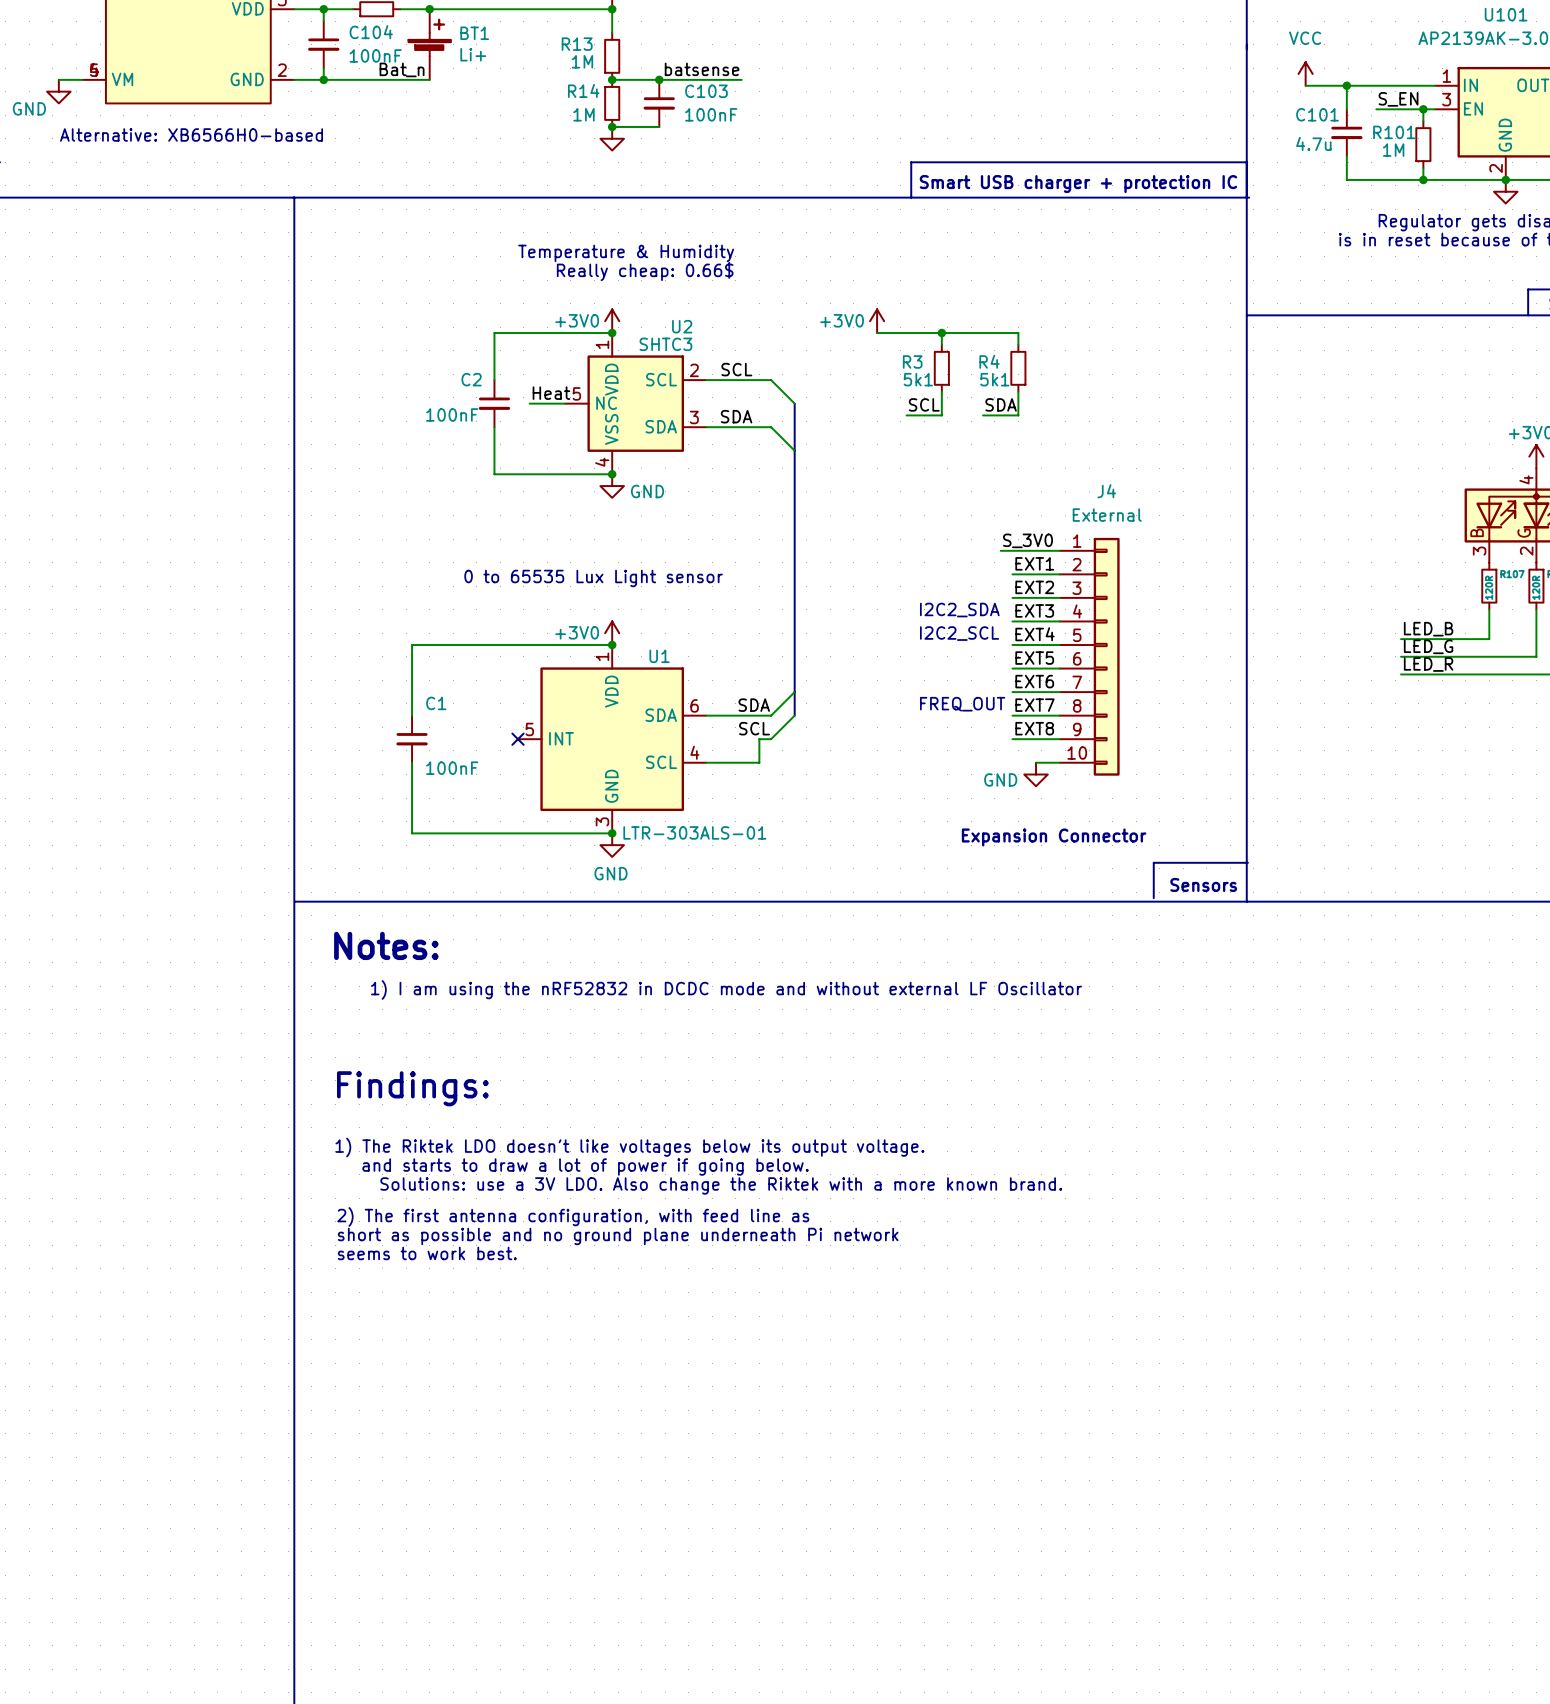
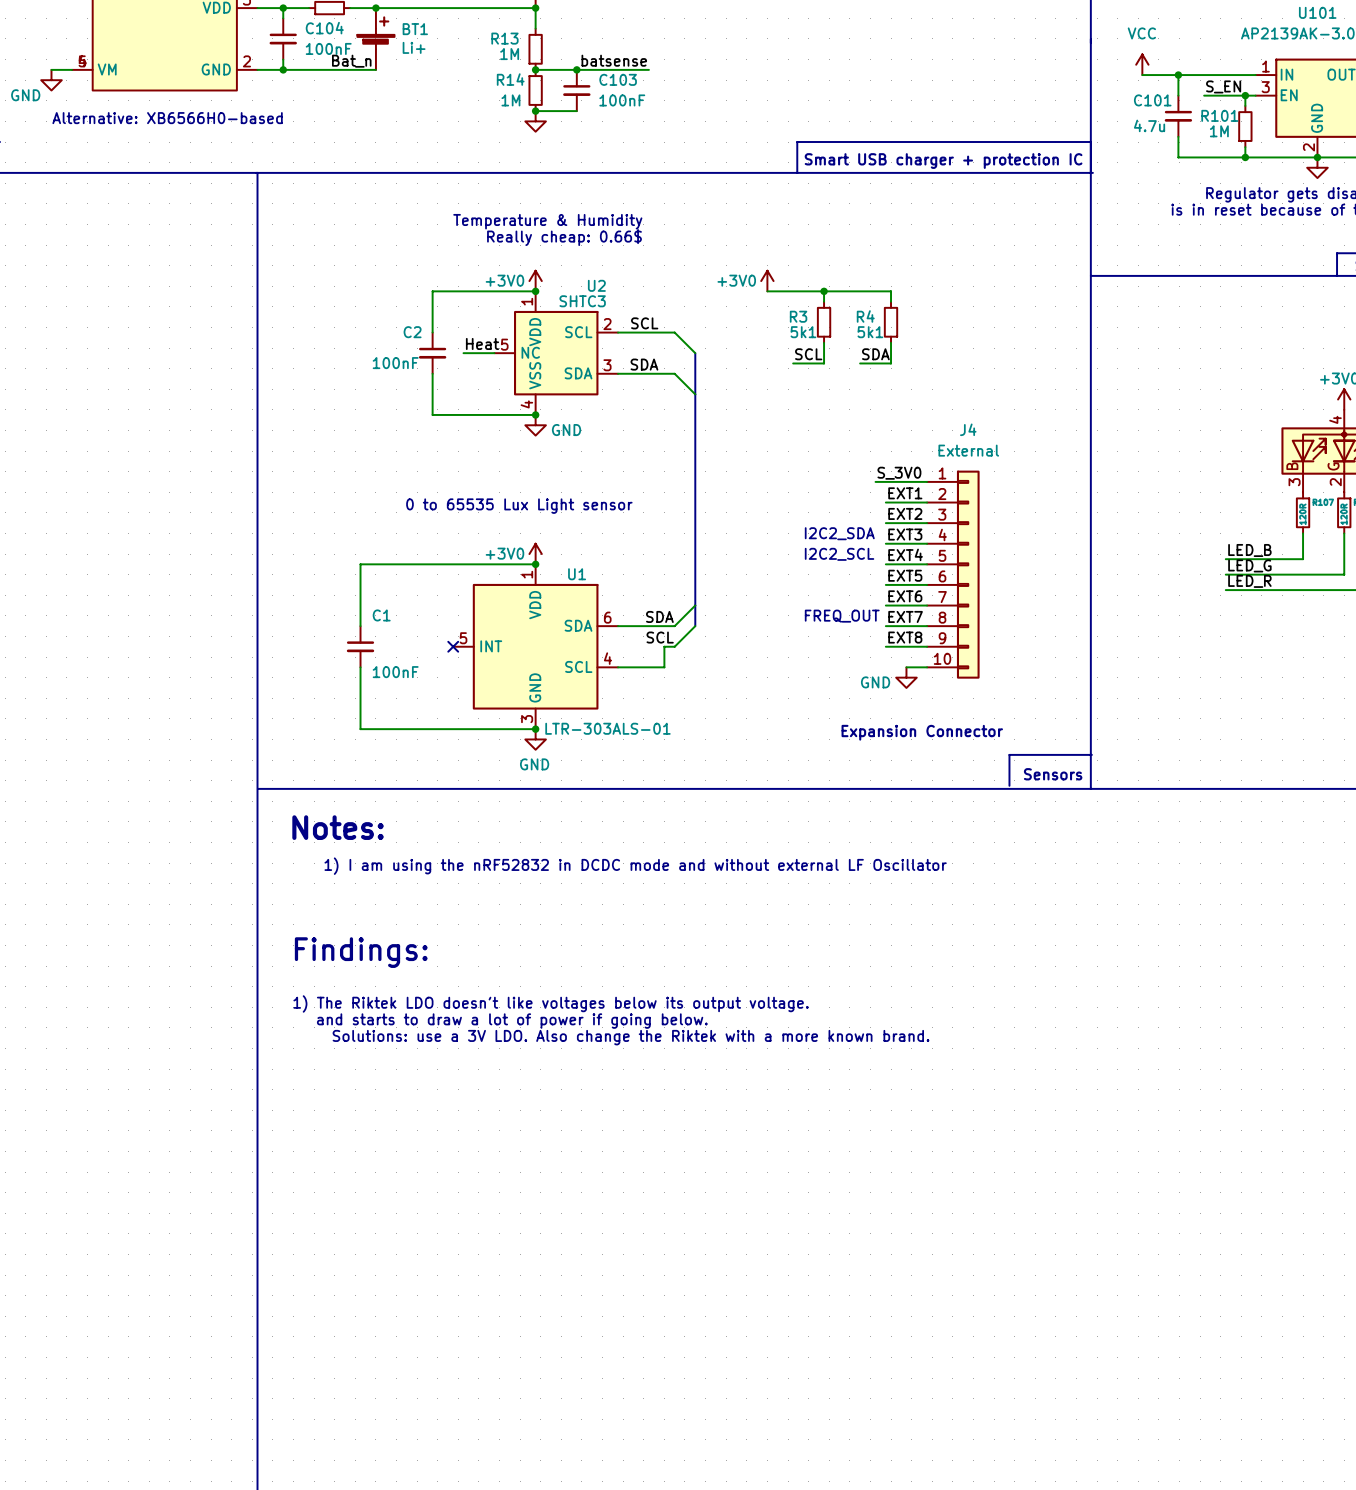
text: 2) The first antenna configuration, with feed line as (573, 1216) -> none
text: short as possible and no ground plane underneath Pi network (618, 1236) -> none
text: seems to work best. (427, 1253) -> none

